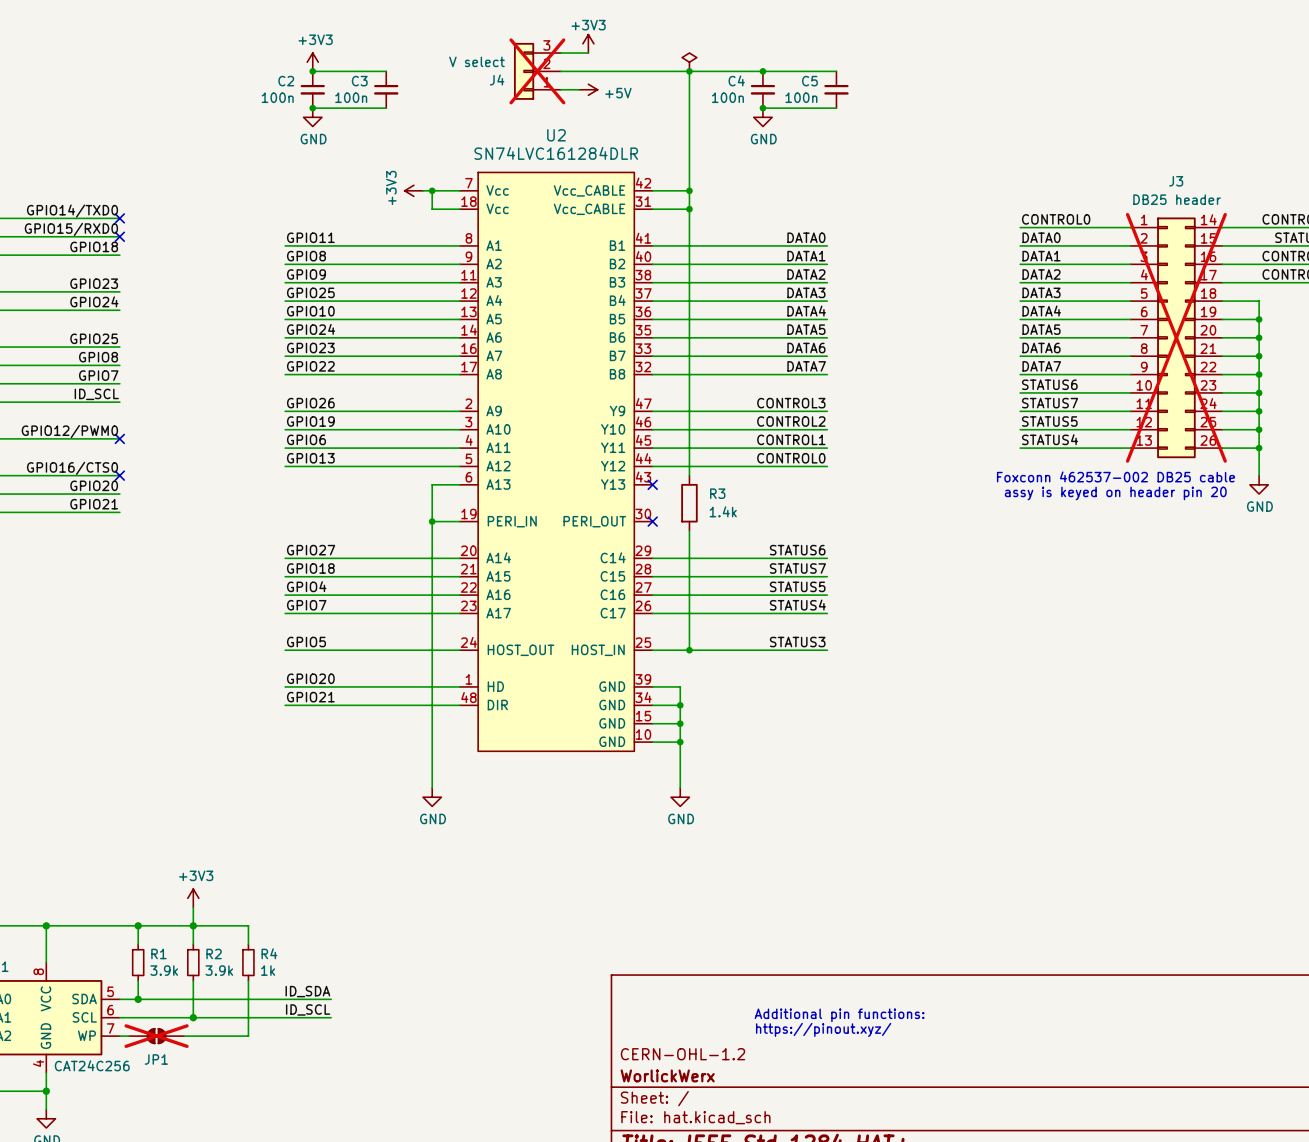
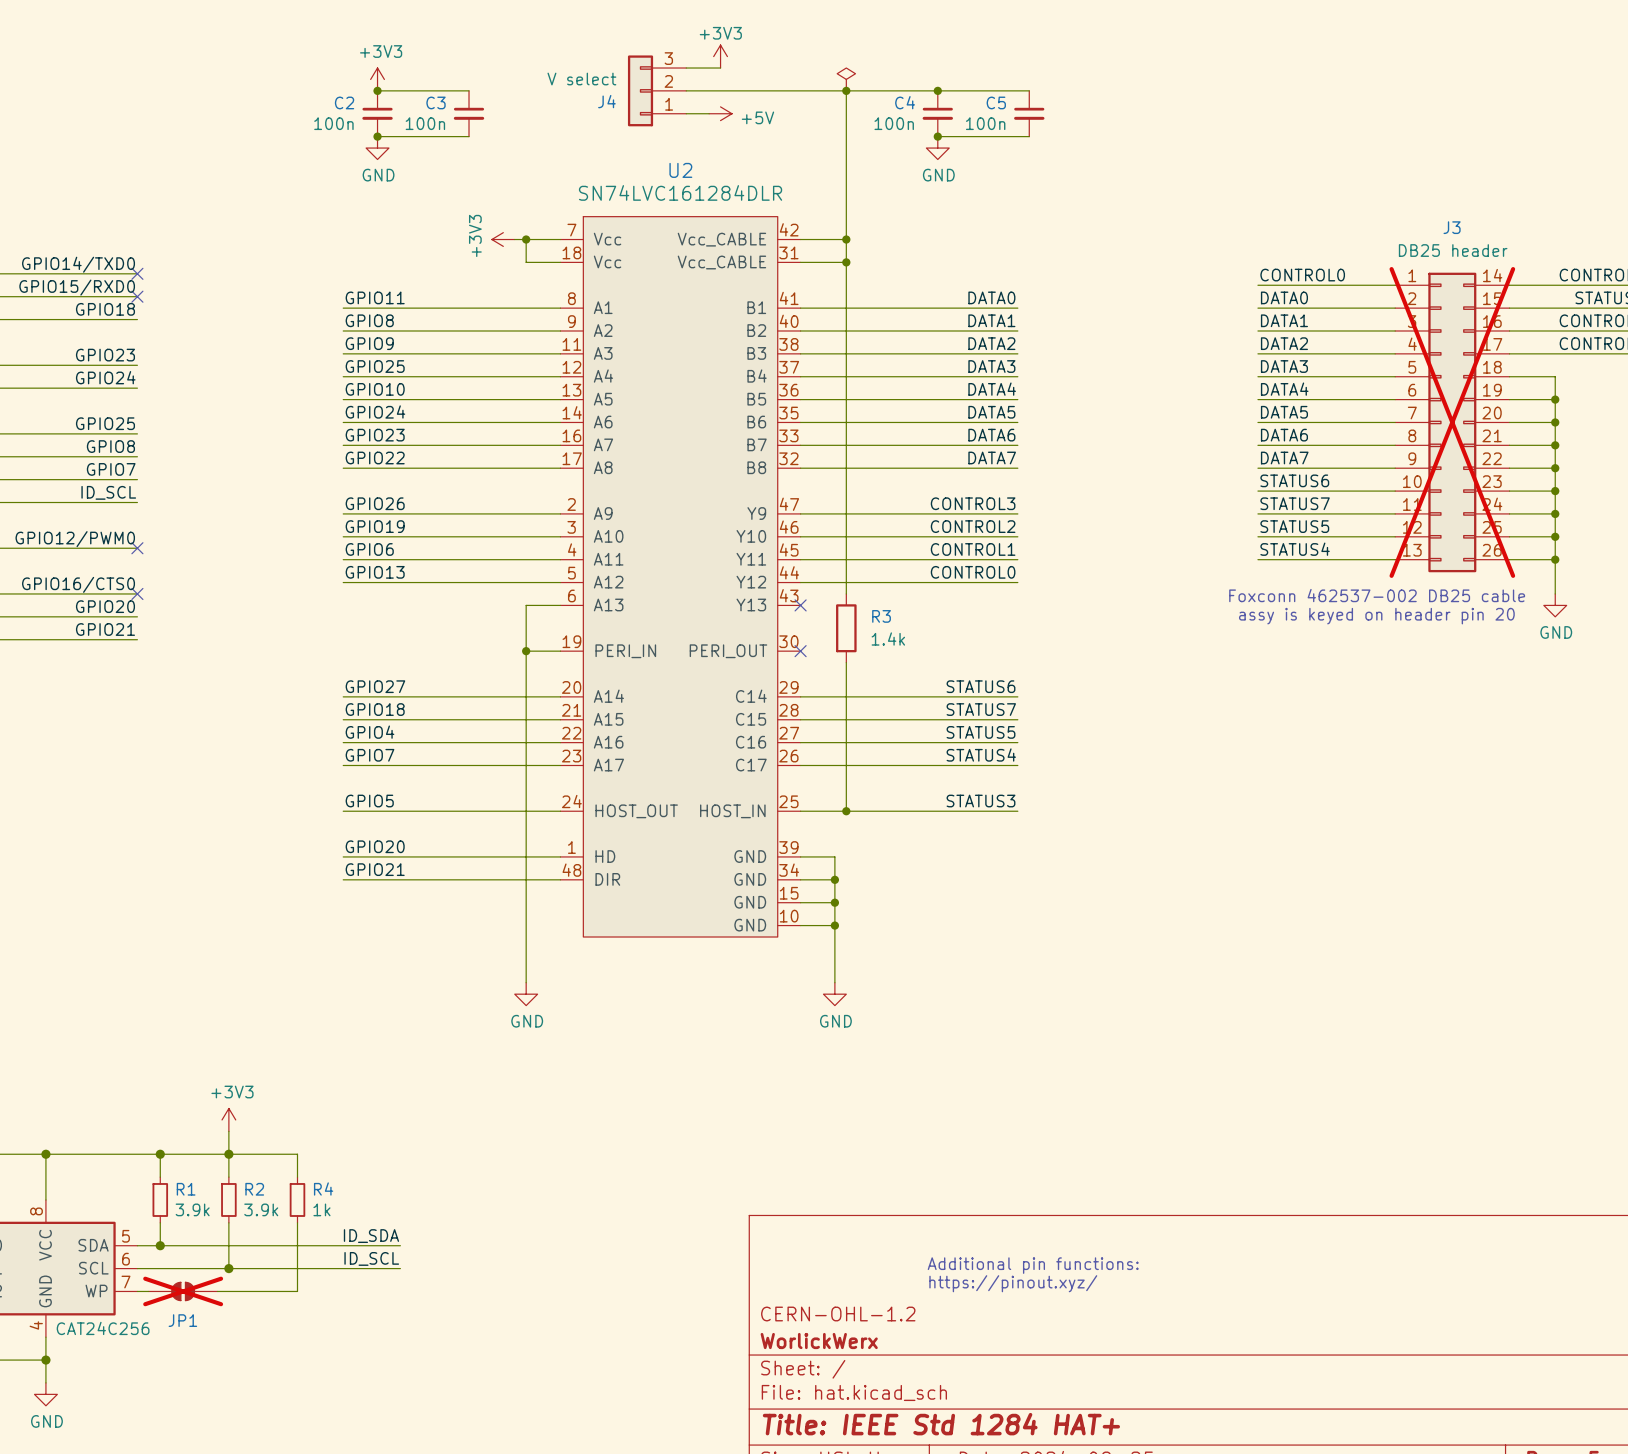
J4 do-not-place cross: (537, 71) -> none

